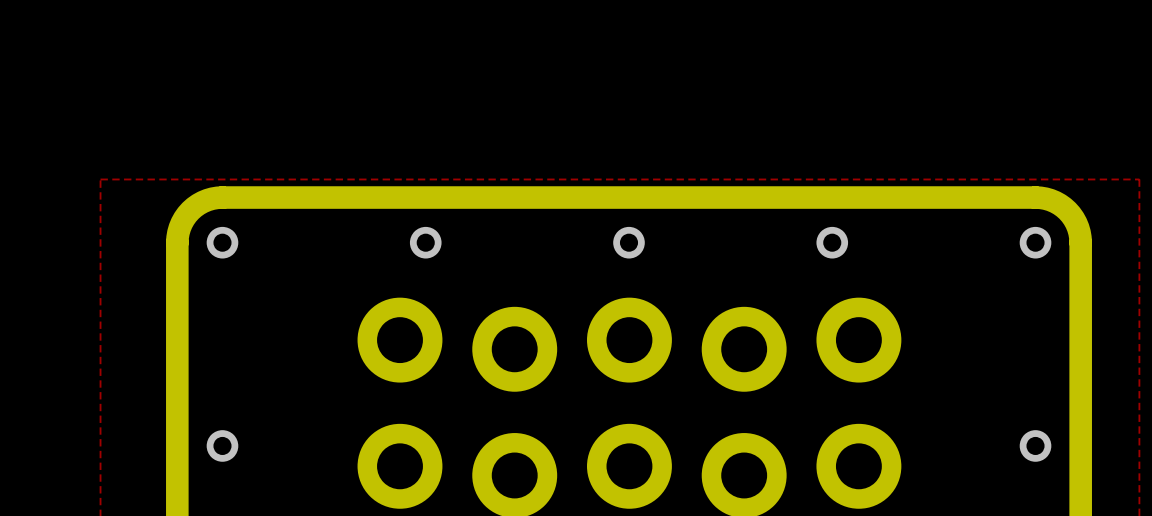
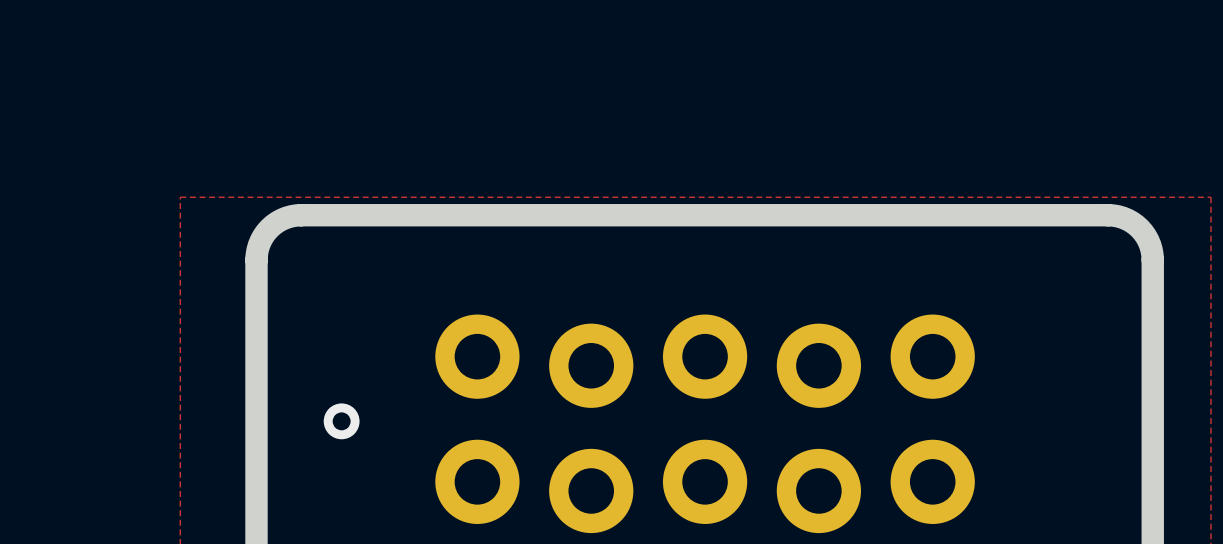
via: (222, 242) -> none
via: (425, 242) -> none
via: (629, 242) -> none
via: (832, 242) -> none
via: (1035, 242) -> none
via: none -> (341, 421)
via: (222, 445) -> none
via: (1035, 445) -> none

